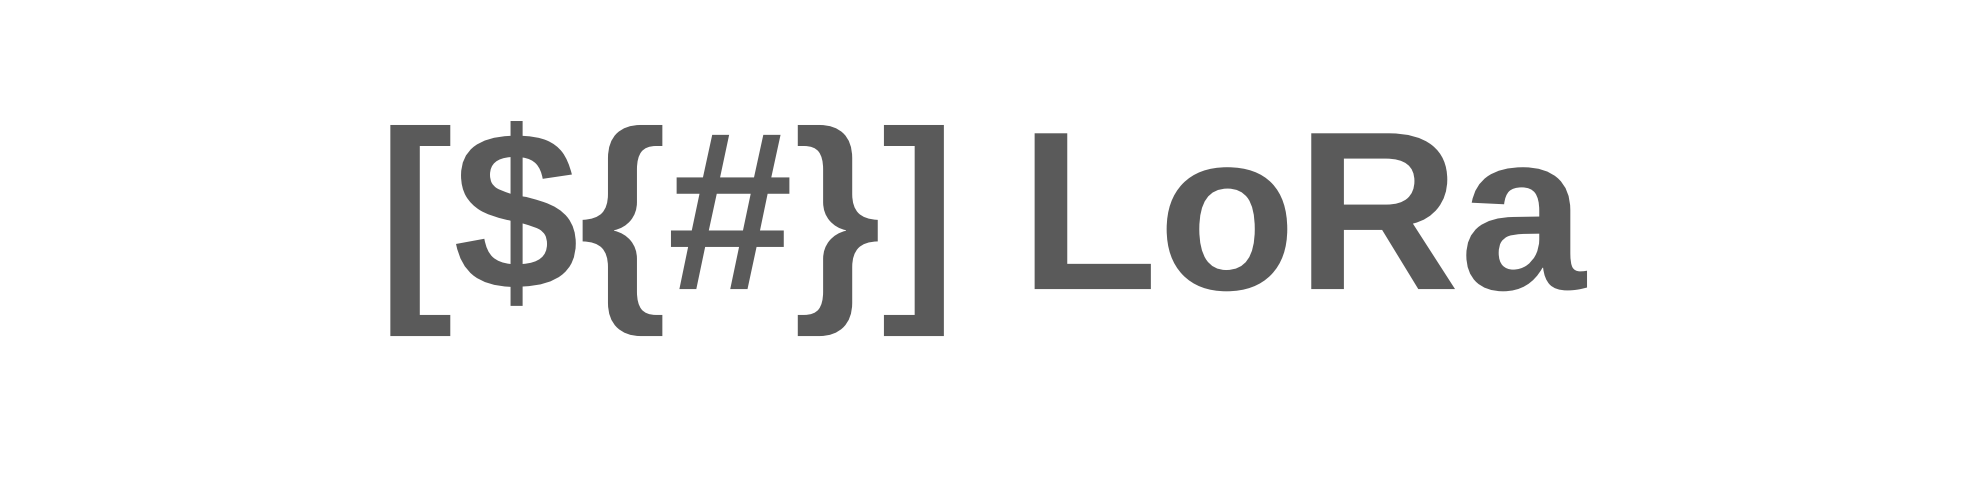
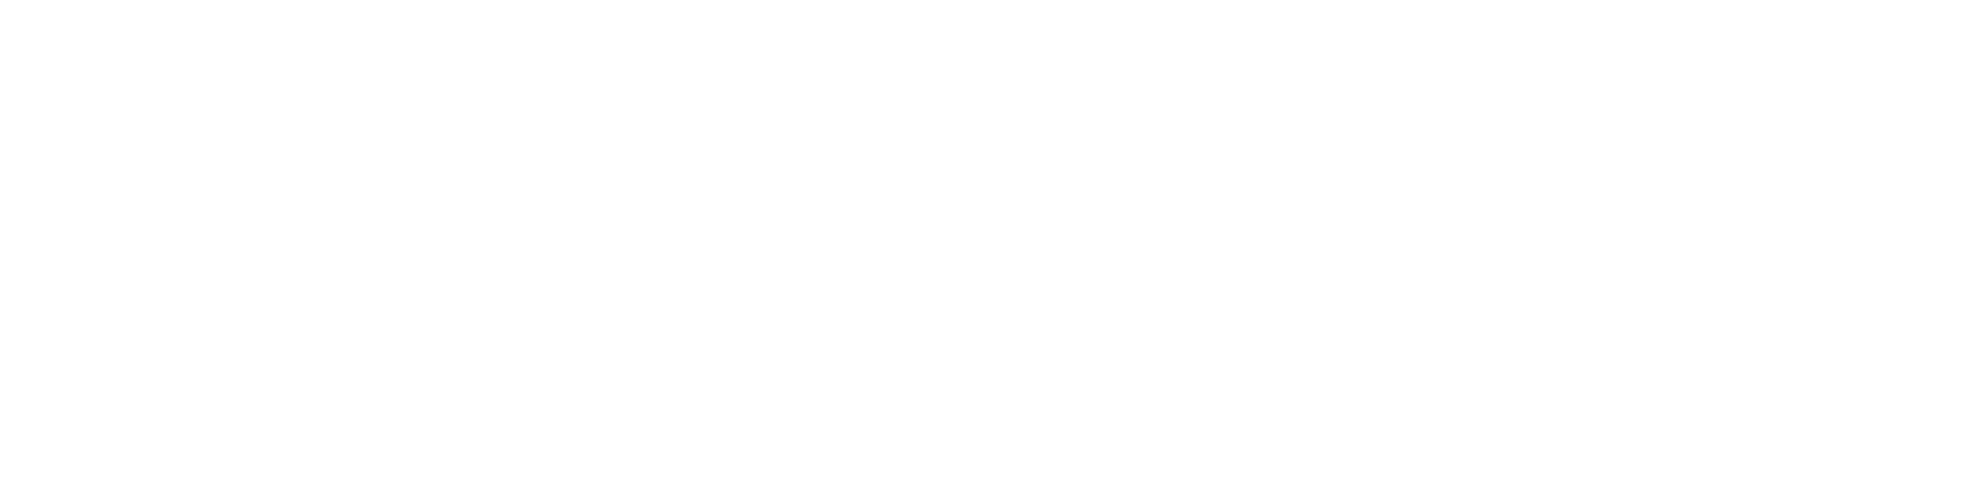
text: [${#}] LoRa (988, 228) -> none

